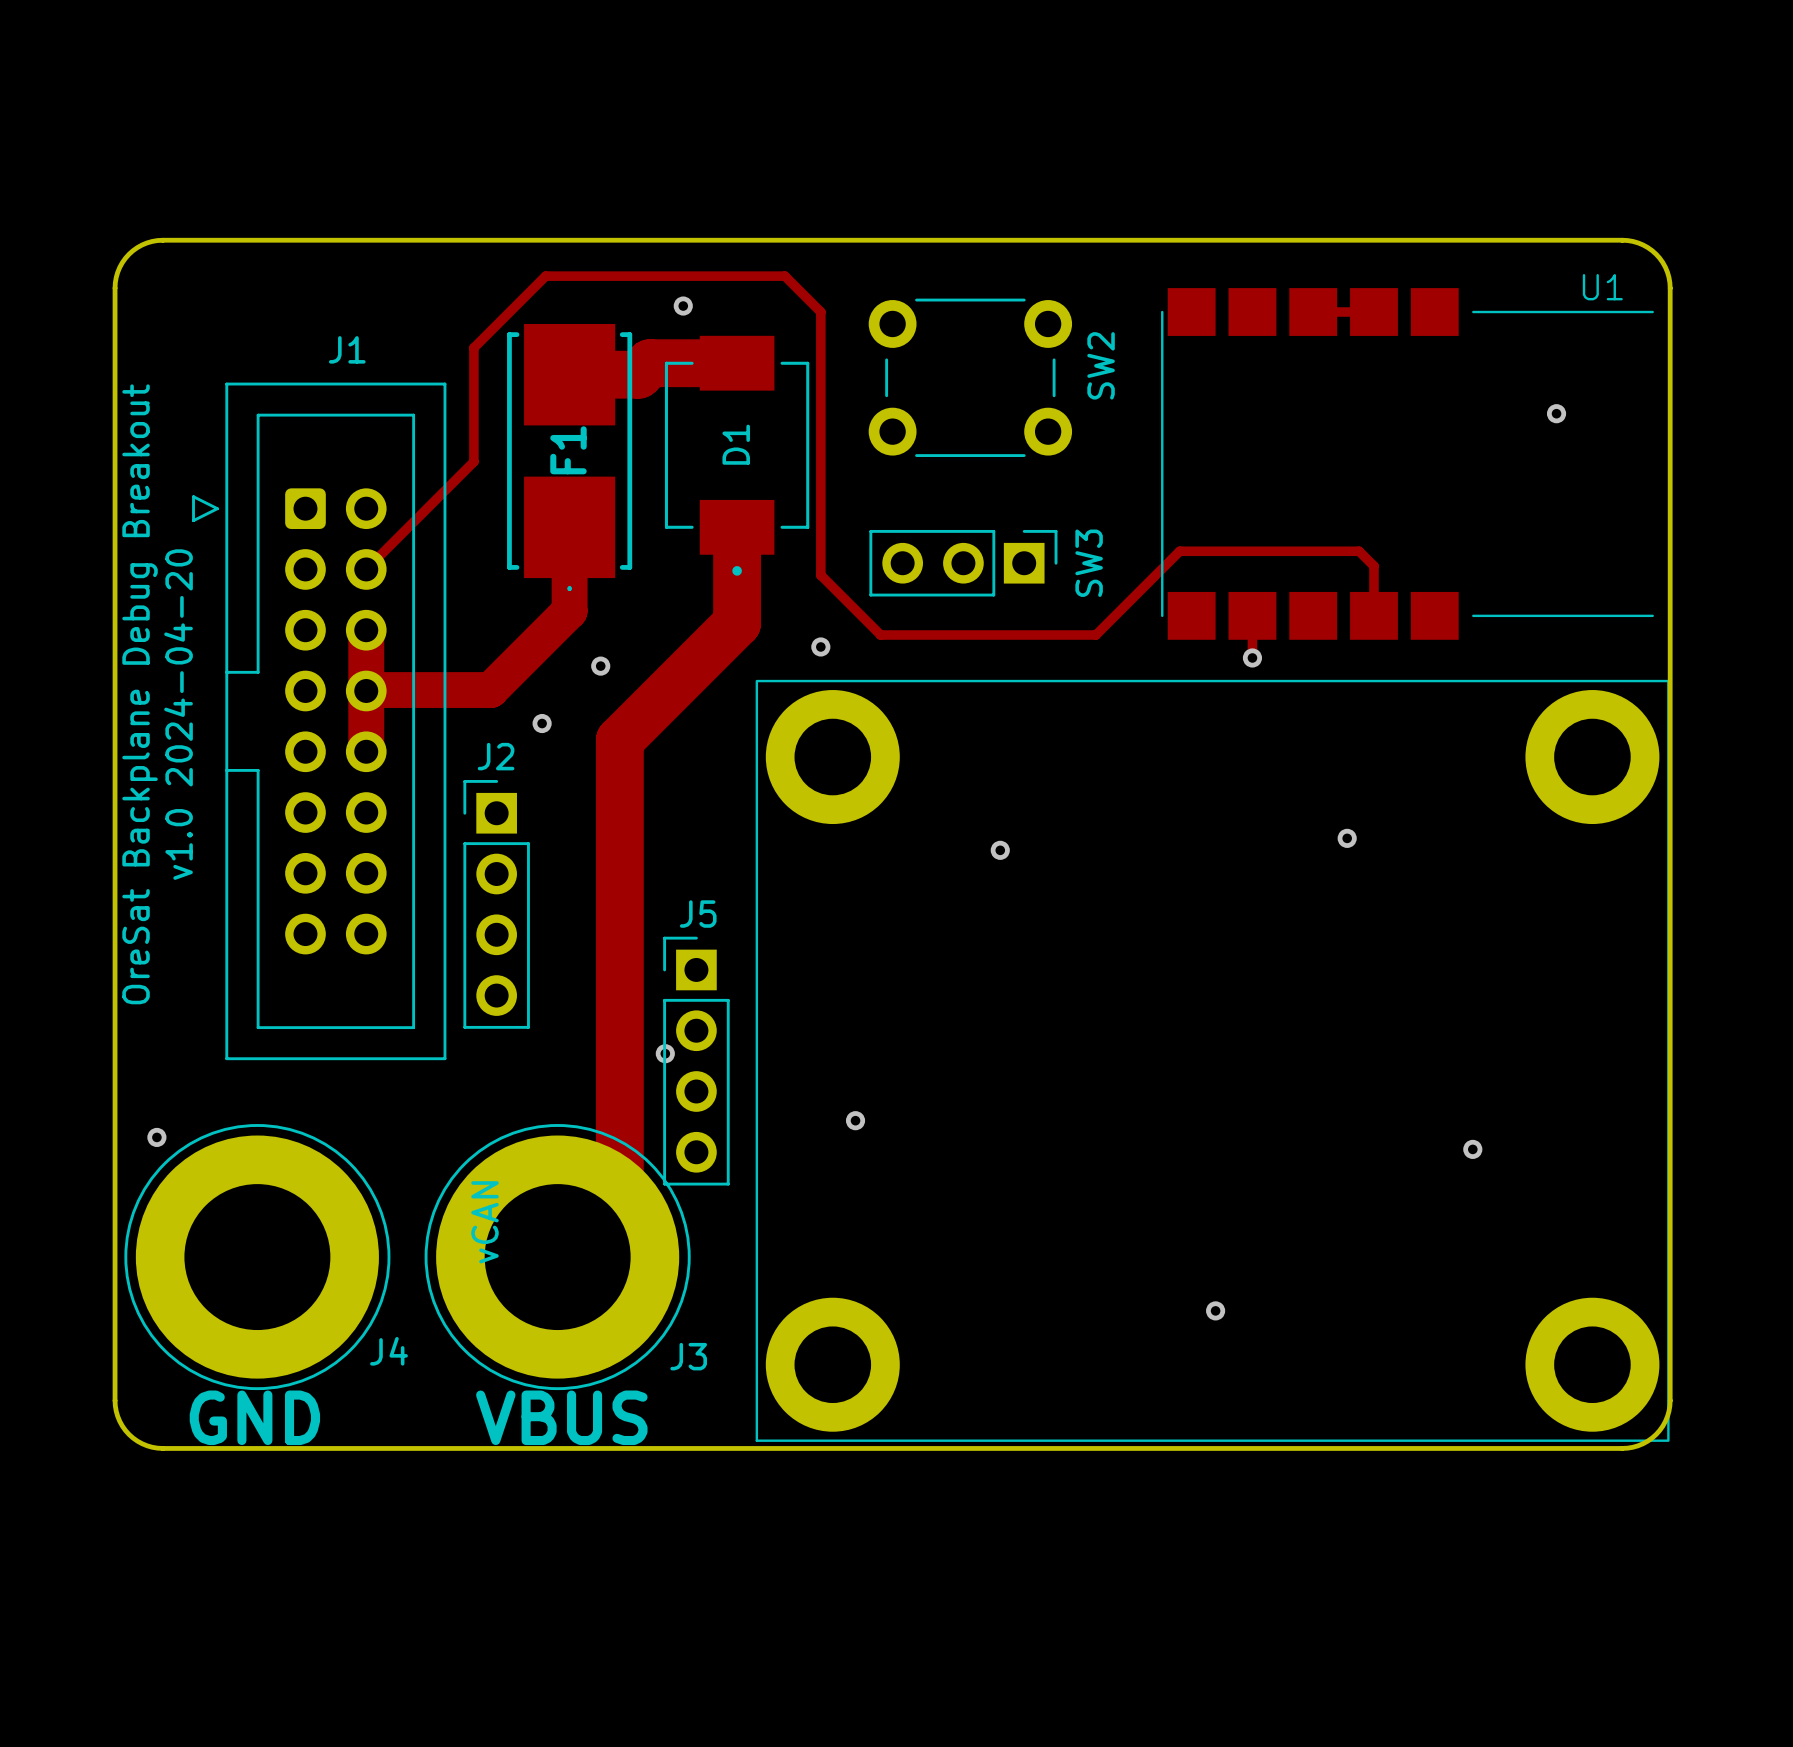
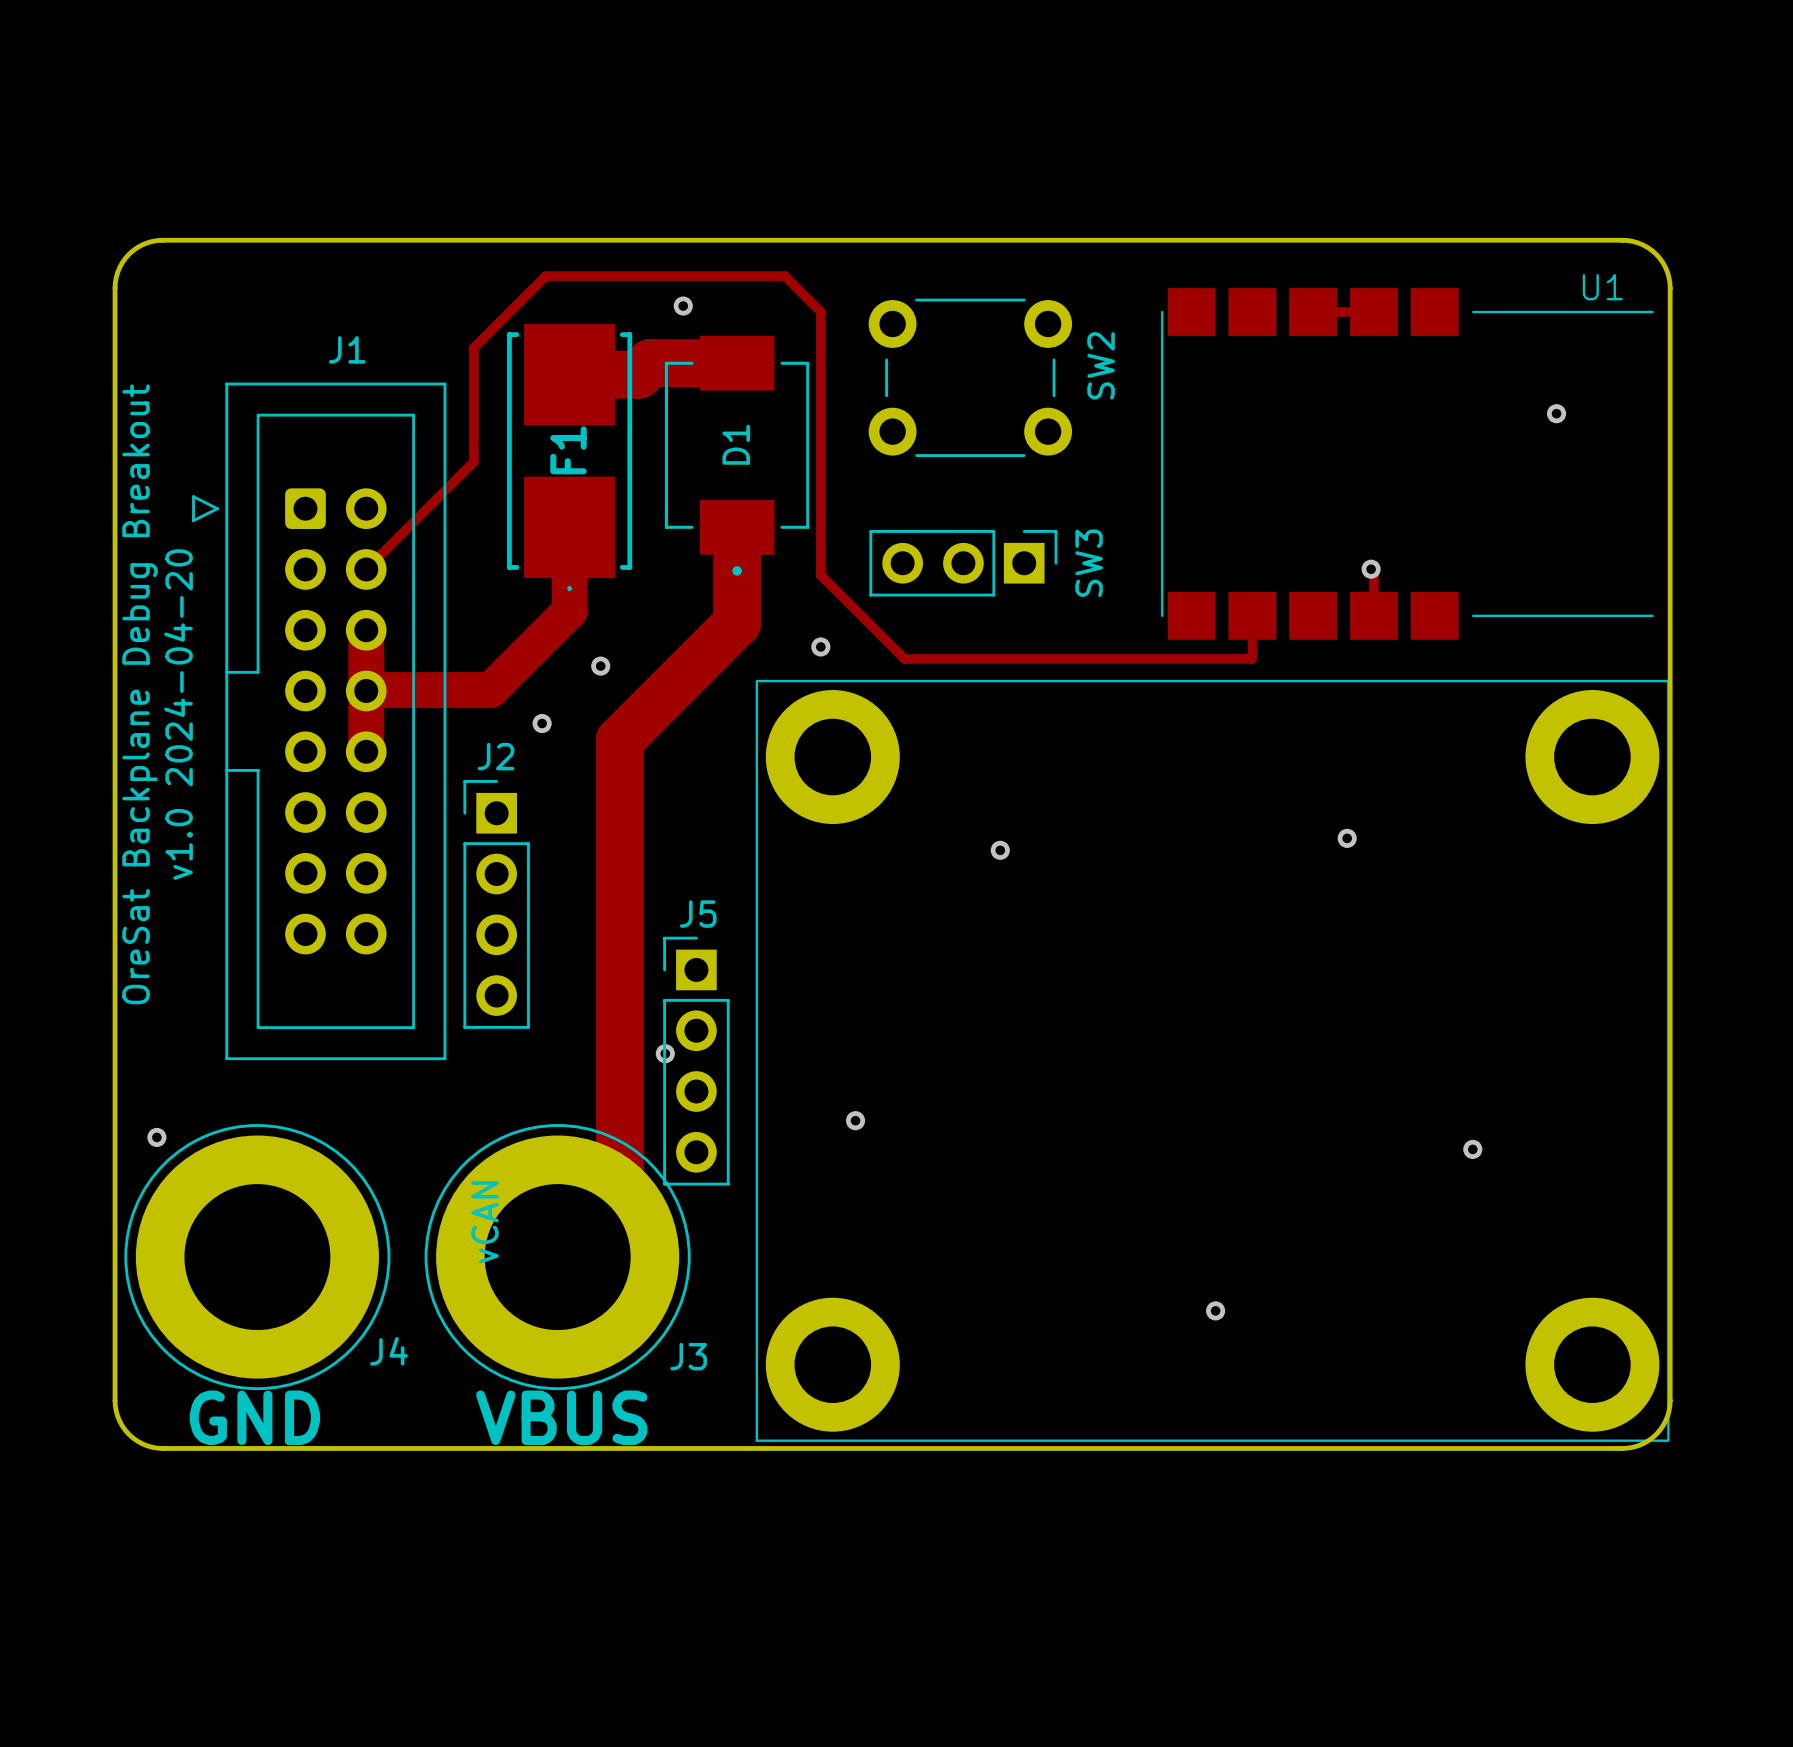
via: none -> (1371, 569)
track: (1373, 572) (1373, 566) (1359, 551) (1179, 551) (1095, 635) (880, 635) -> (1252, 657) (904, 658) (880, 635)
via: (1252, 657) -> none

